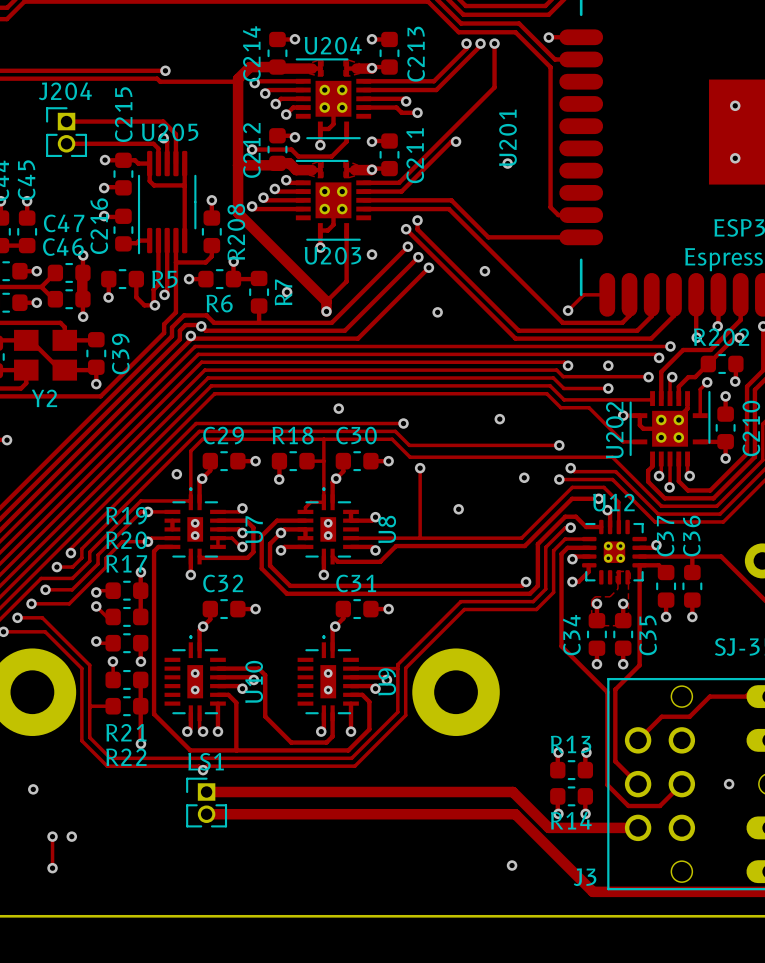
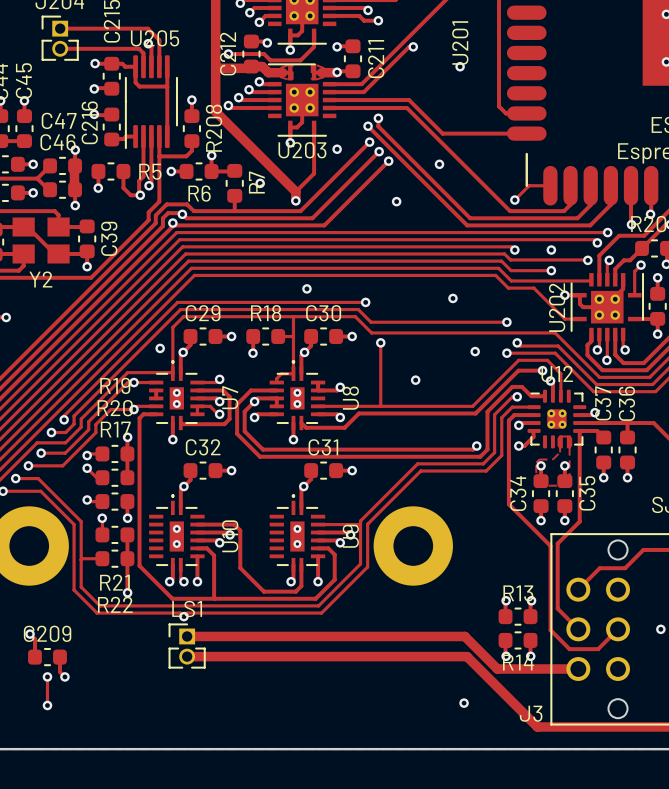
track: none -> (30, 634) (34, 639) (34, 657)
C209: none -> (47, 657)
track: none -> (59, 657) (59, 671) (64, 676)

